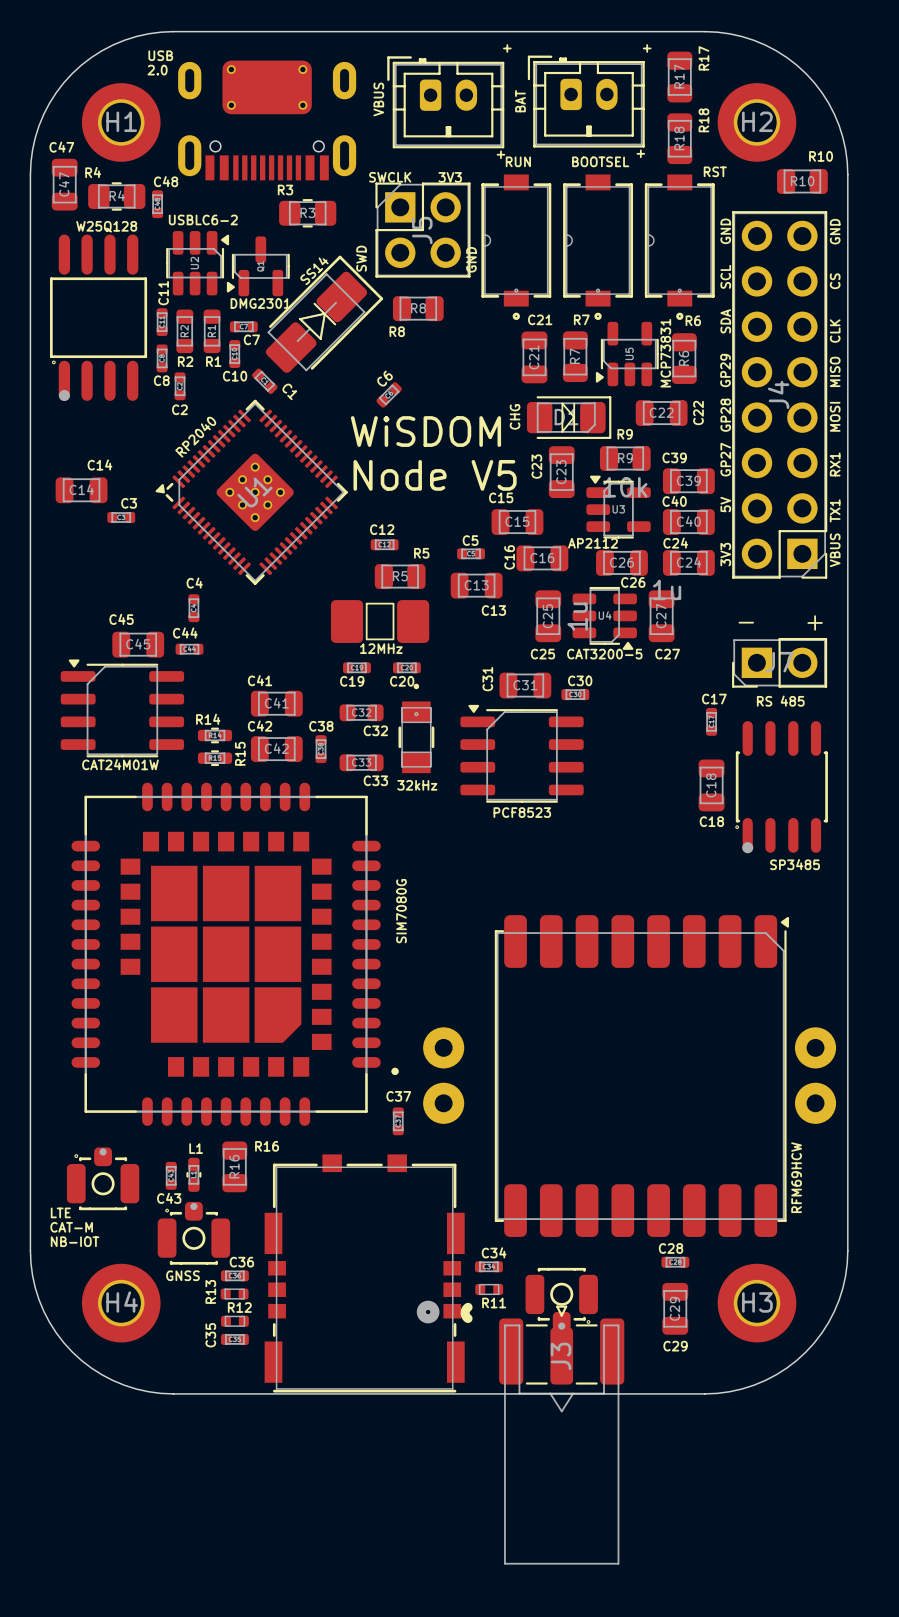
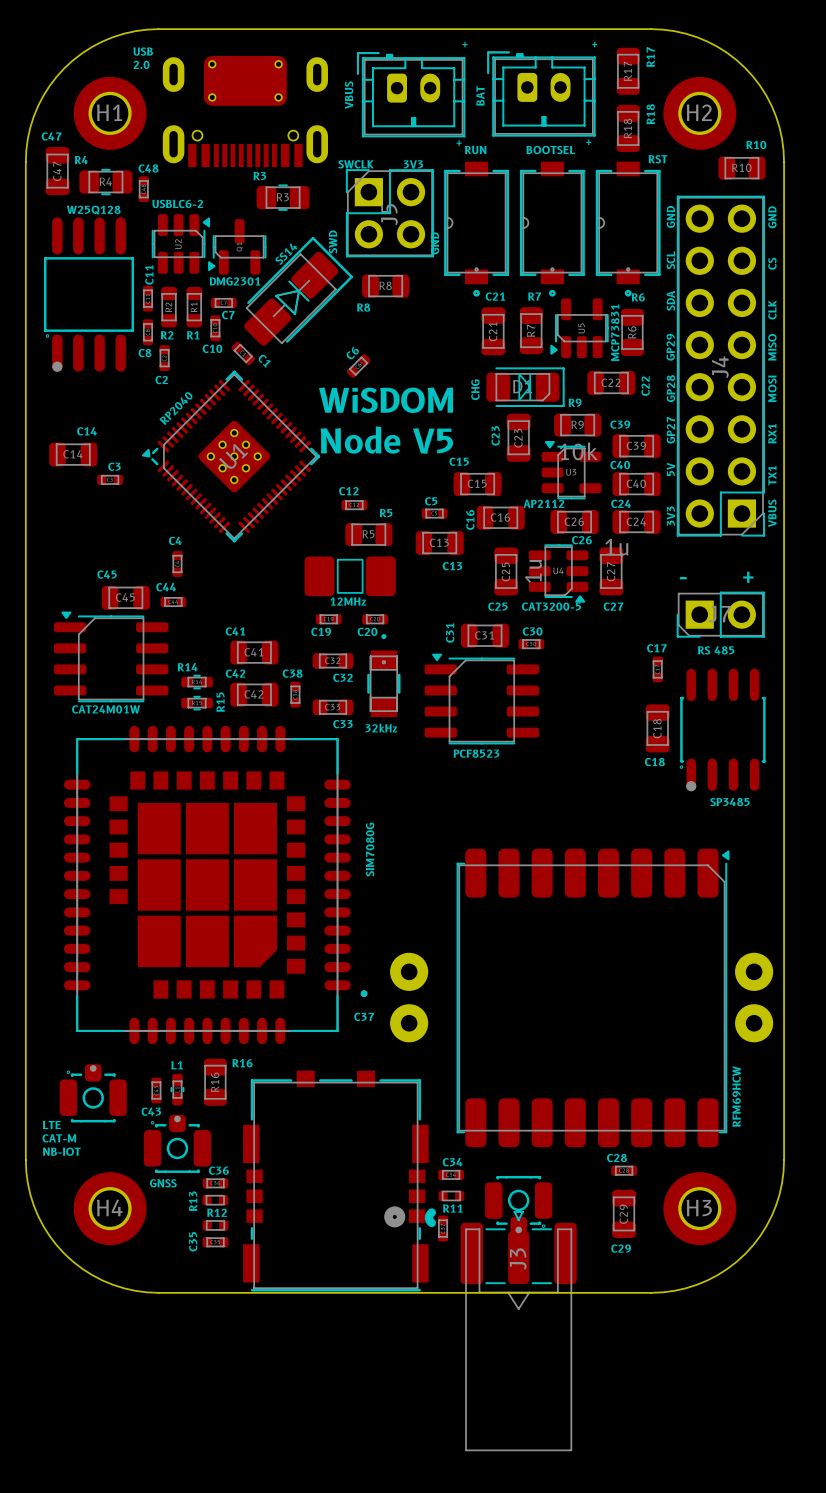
part position: (398, 1121) -> (443, 1228)

